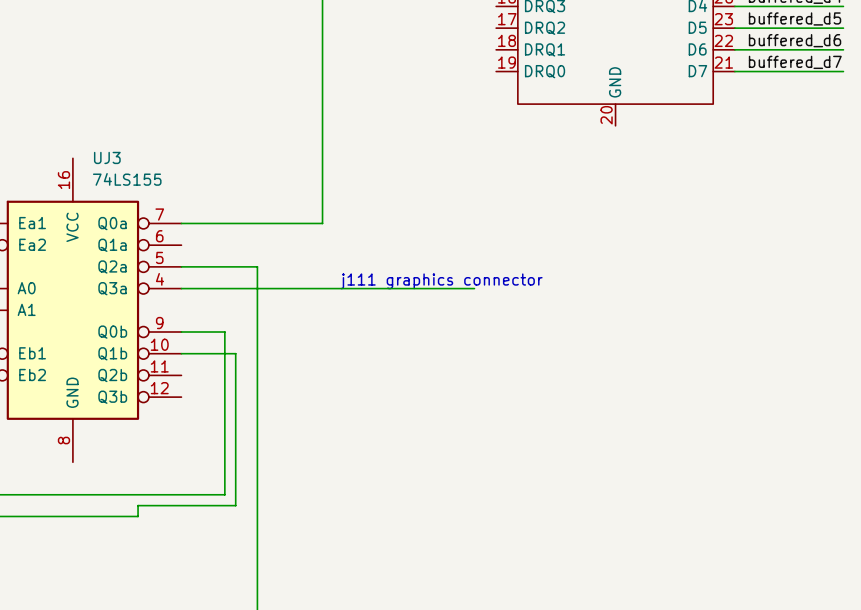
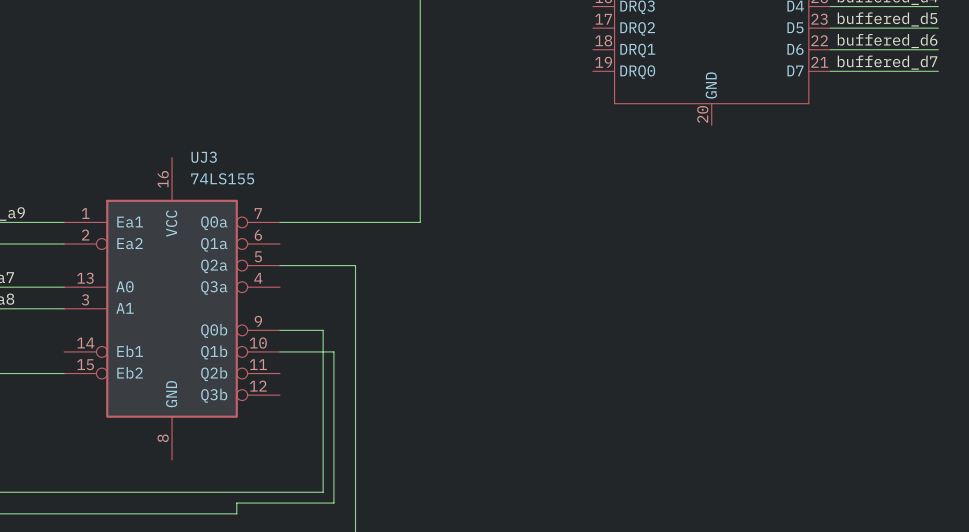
text: j111 graphics connector (441, 281) -> none
wire: (181, 288) (474, 288) -> none

